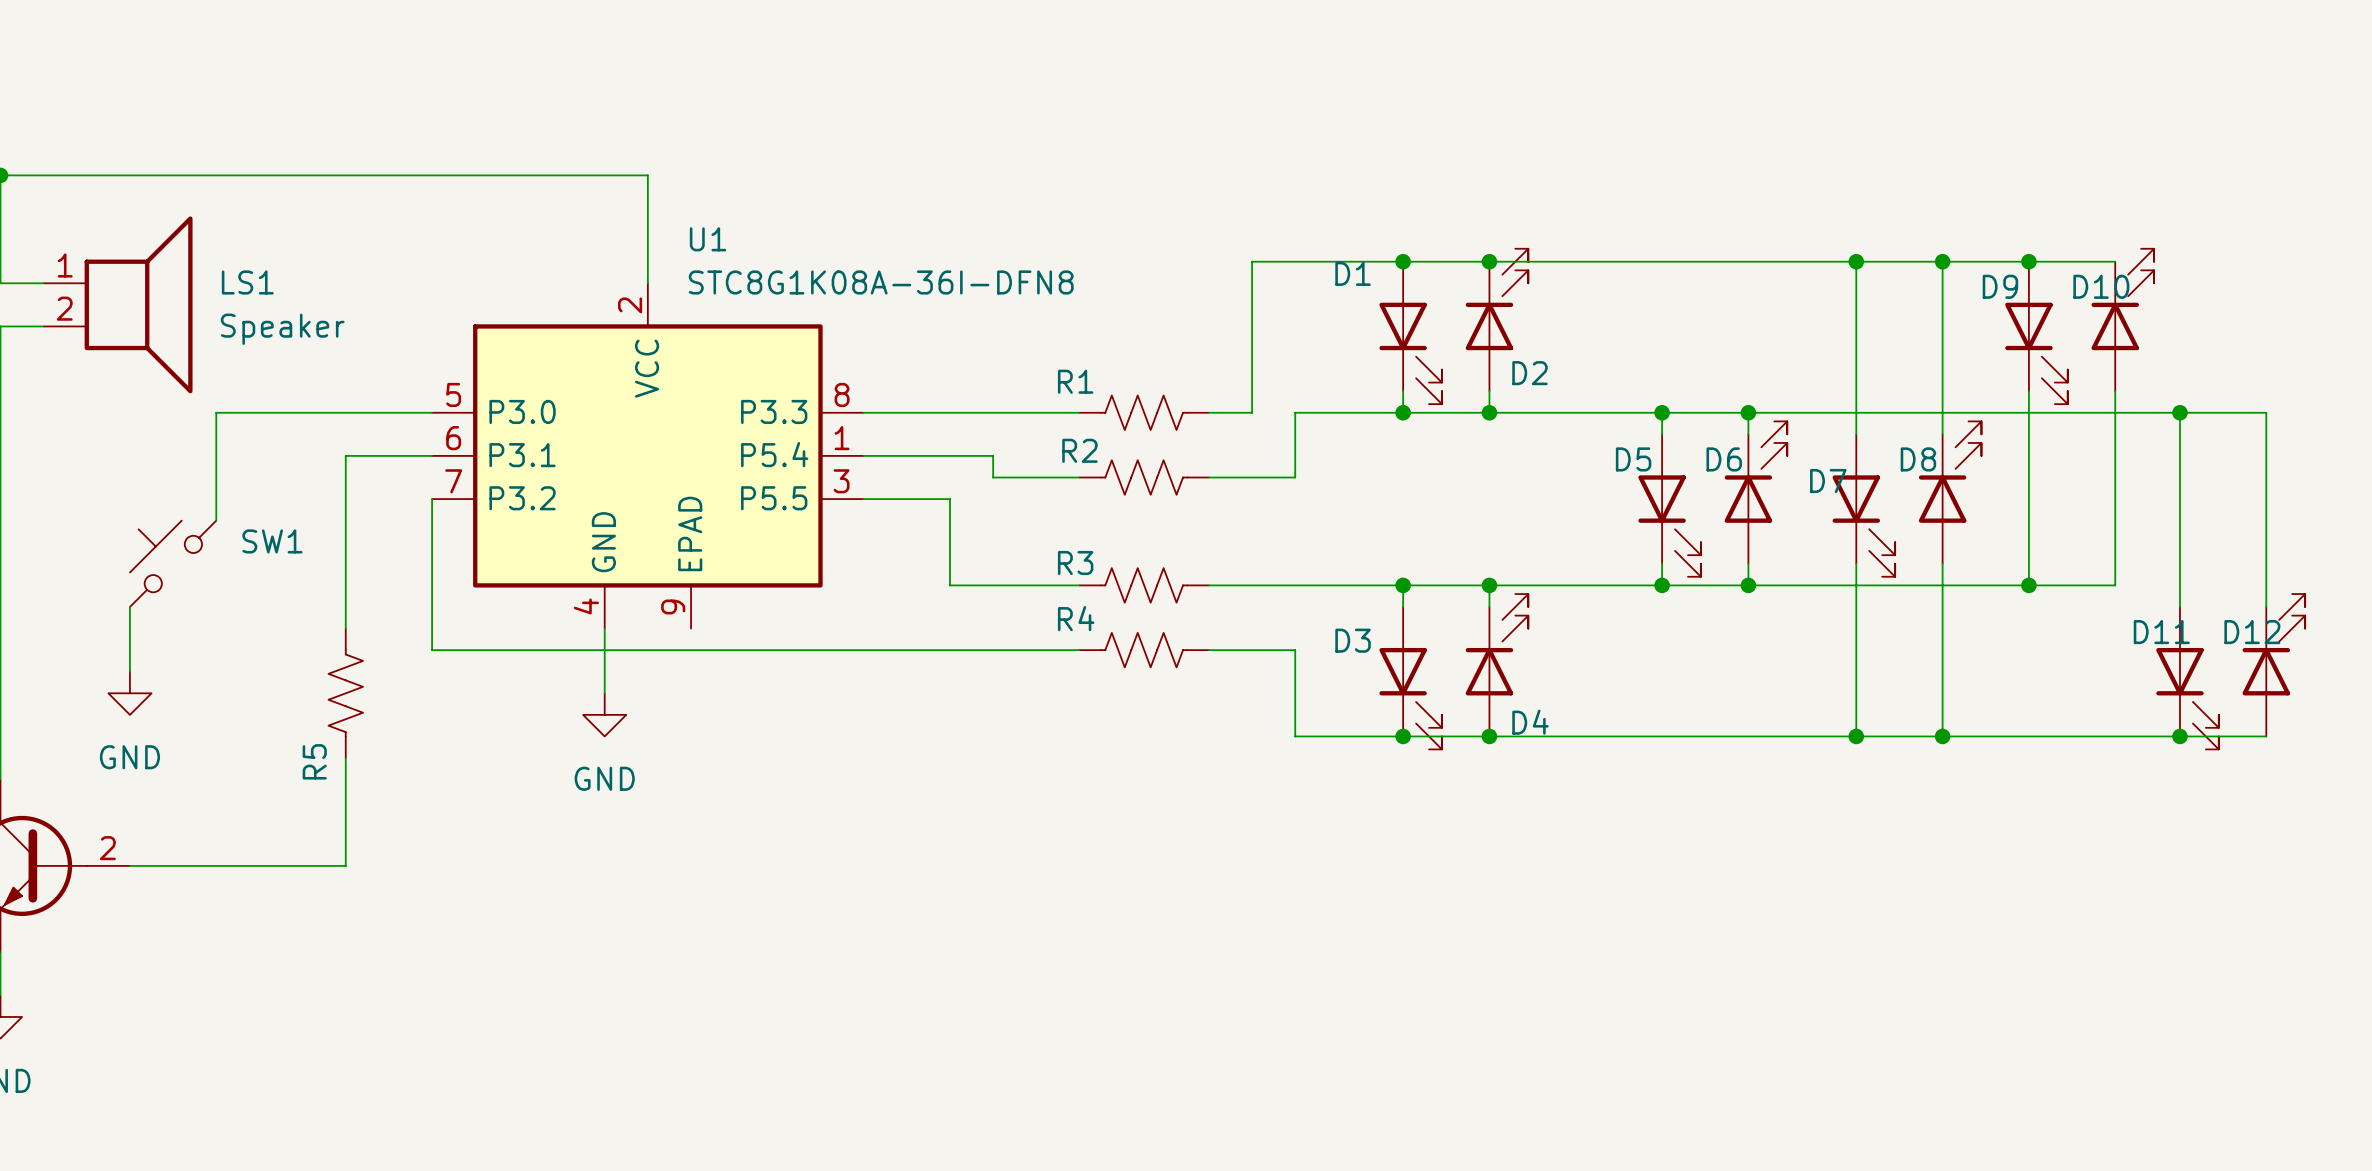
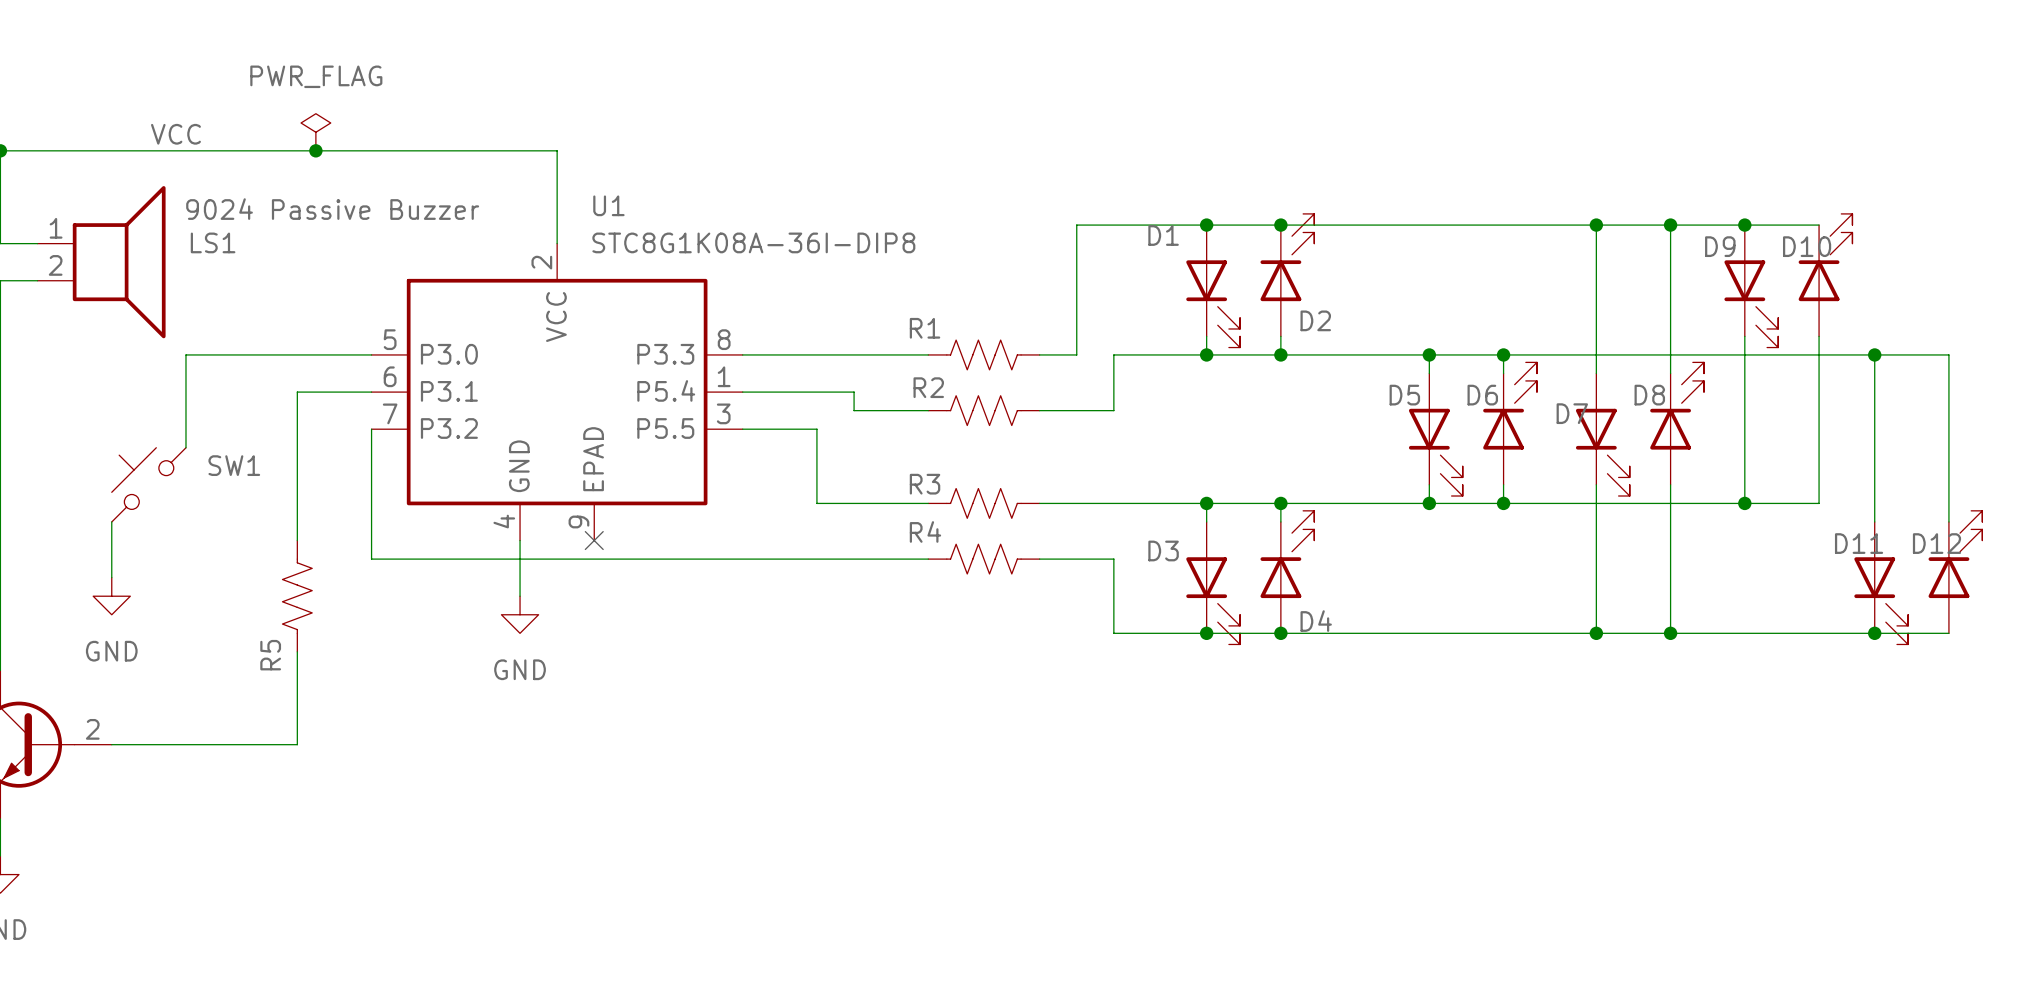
power symbol: none -> PWR_FLAG (315, 132)
label: none -> VCC (175, 134)
junction: none -> (315, 150)
U1 value: STC8G1K08A-36I-DFN8 (881, 282) -> STC8G1K08A-36I-DIP8 (753, 242)
LS1 value: Speaker (282, 329) -> 9024 Passive Buzzer (332, 209)
no-connect mark: none -> (594, 540)

